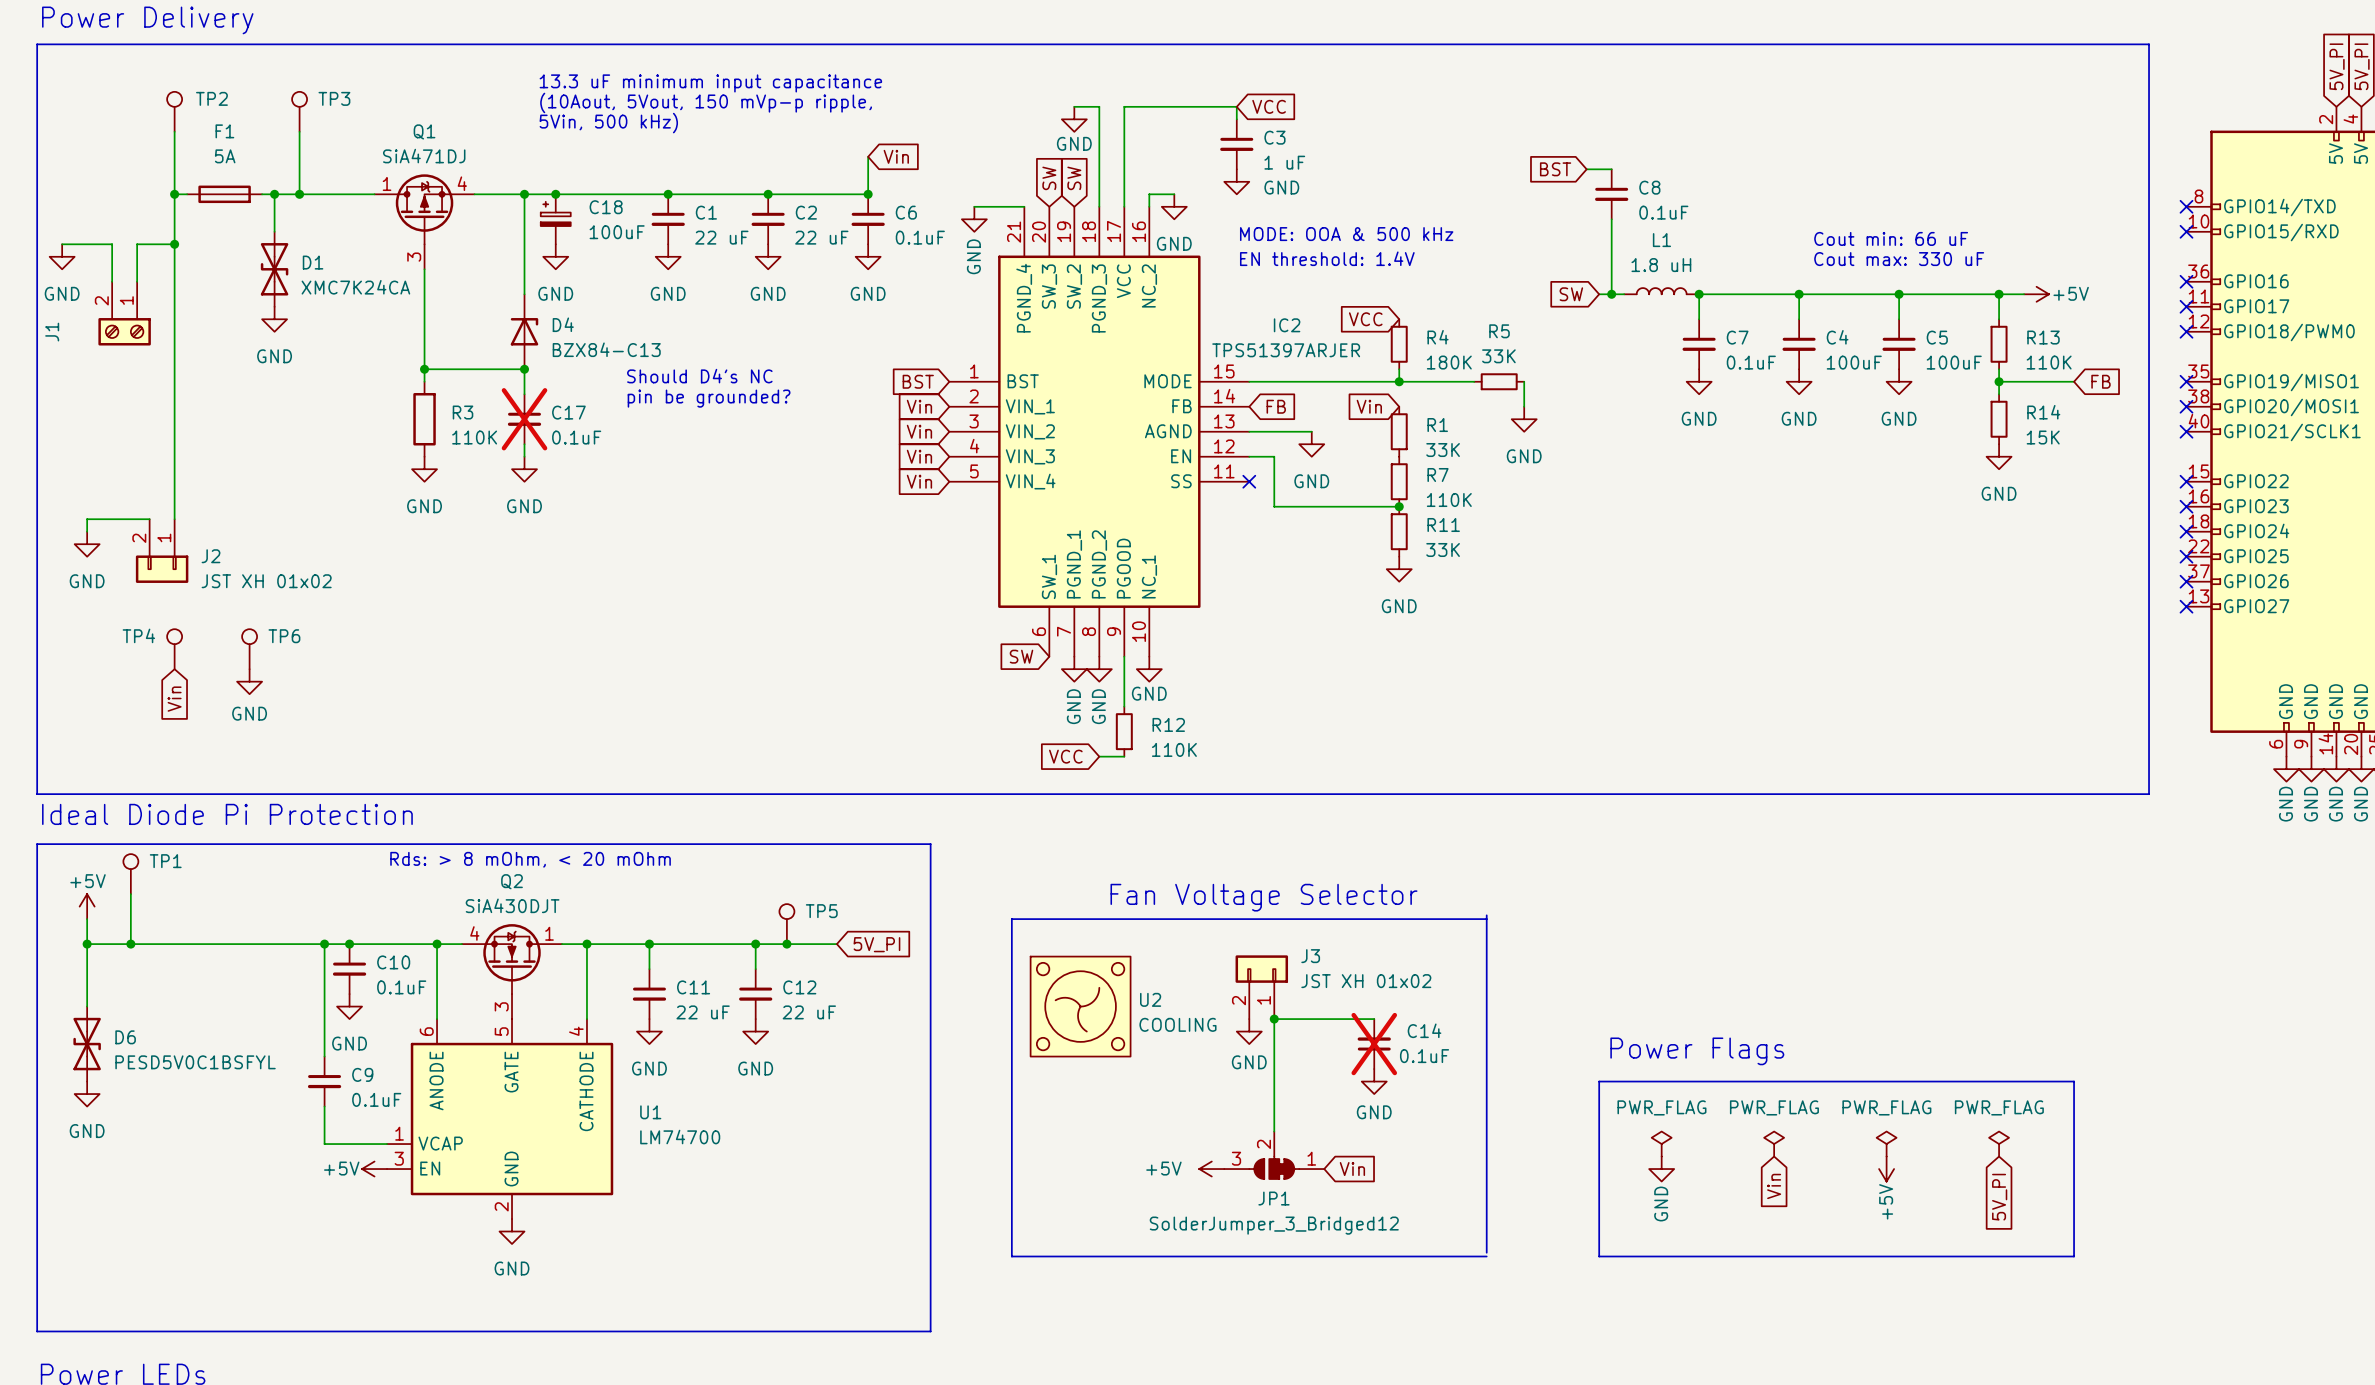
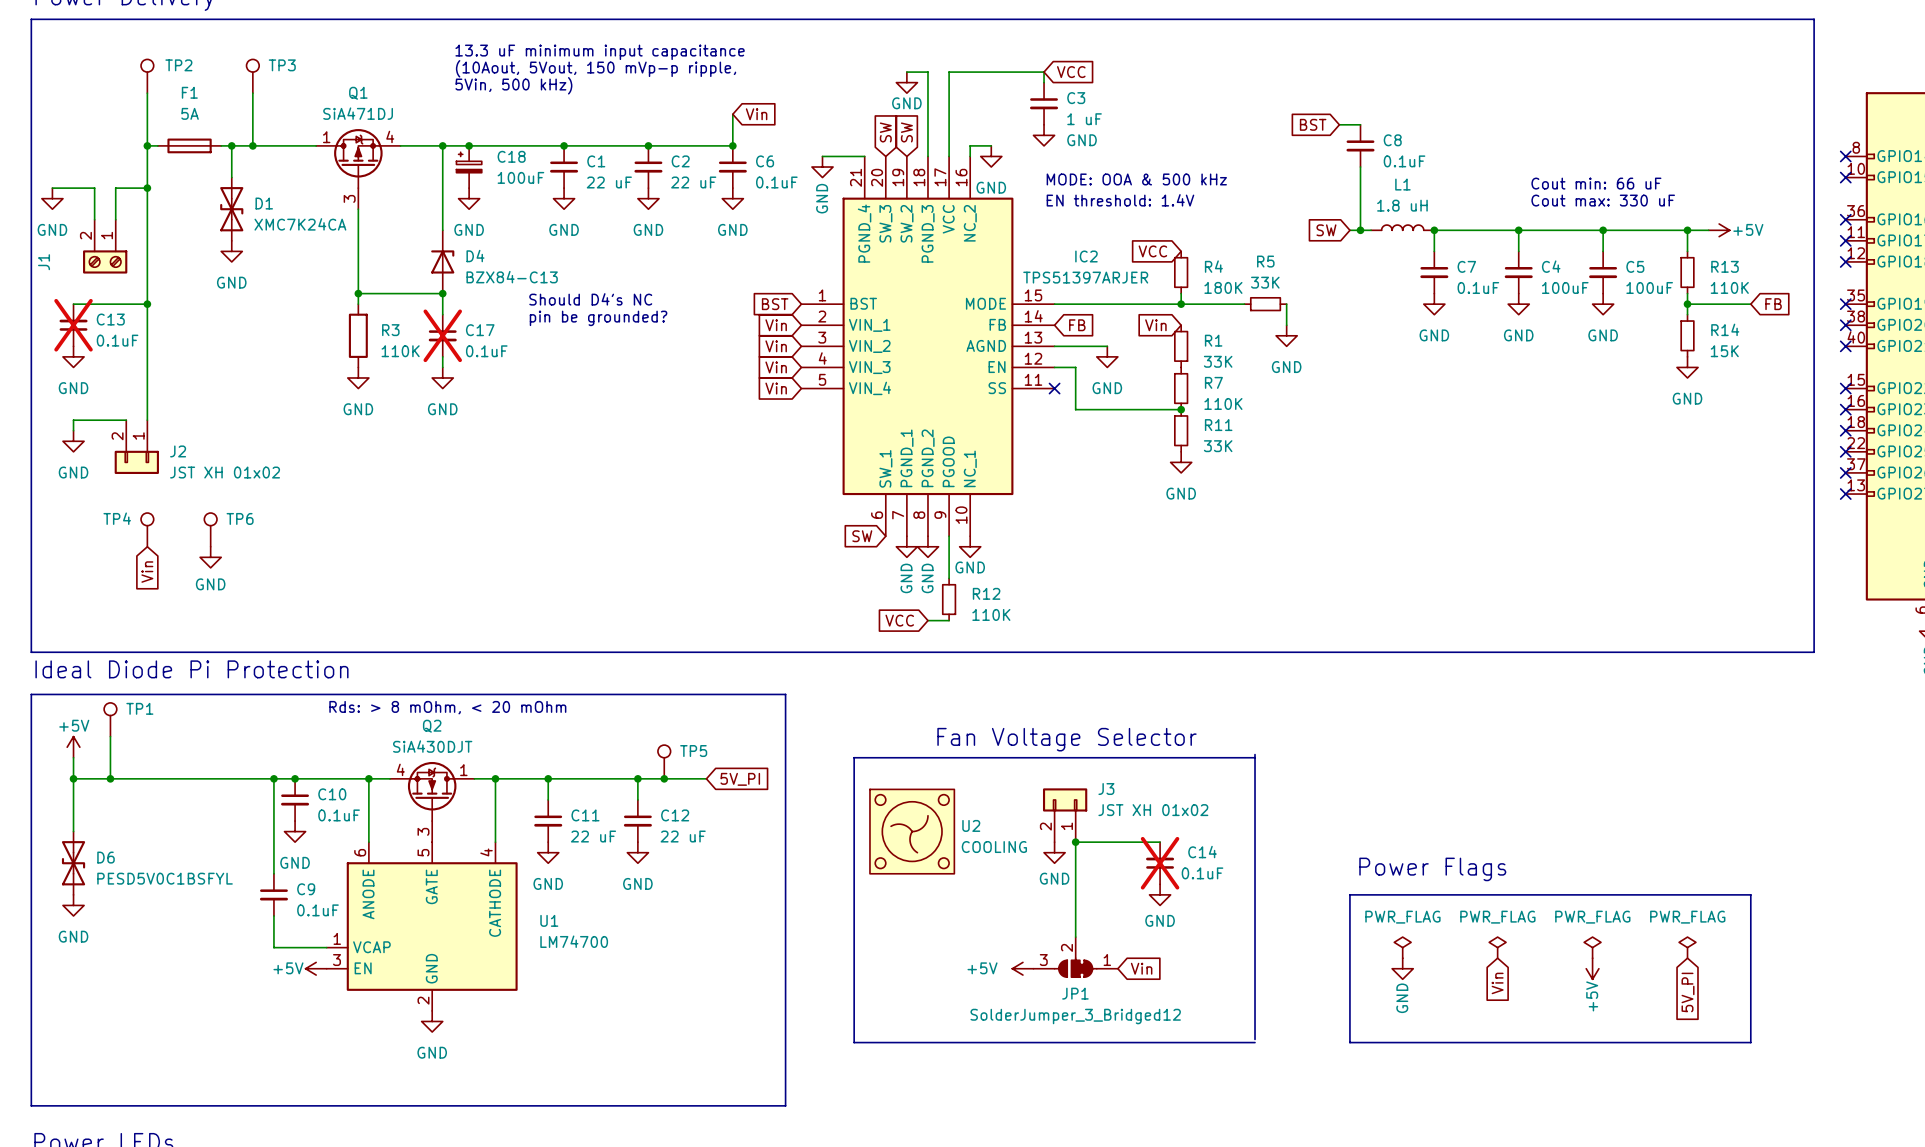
wire: none -> (73, 304) (147, 304)
junction: none -> (147, 304)
C13: none -> 0.1uF (73, 325)
power symbol: none -> GND (73, 356)

